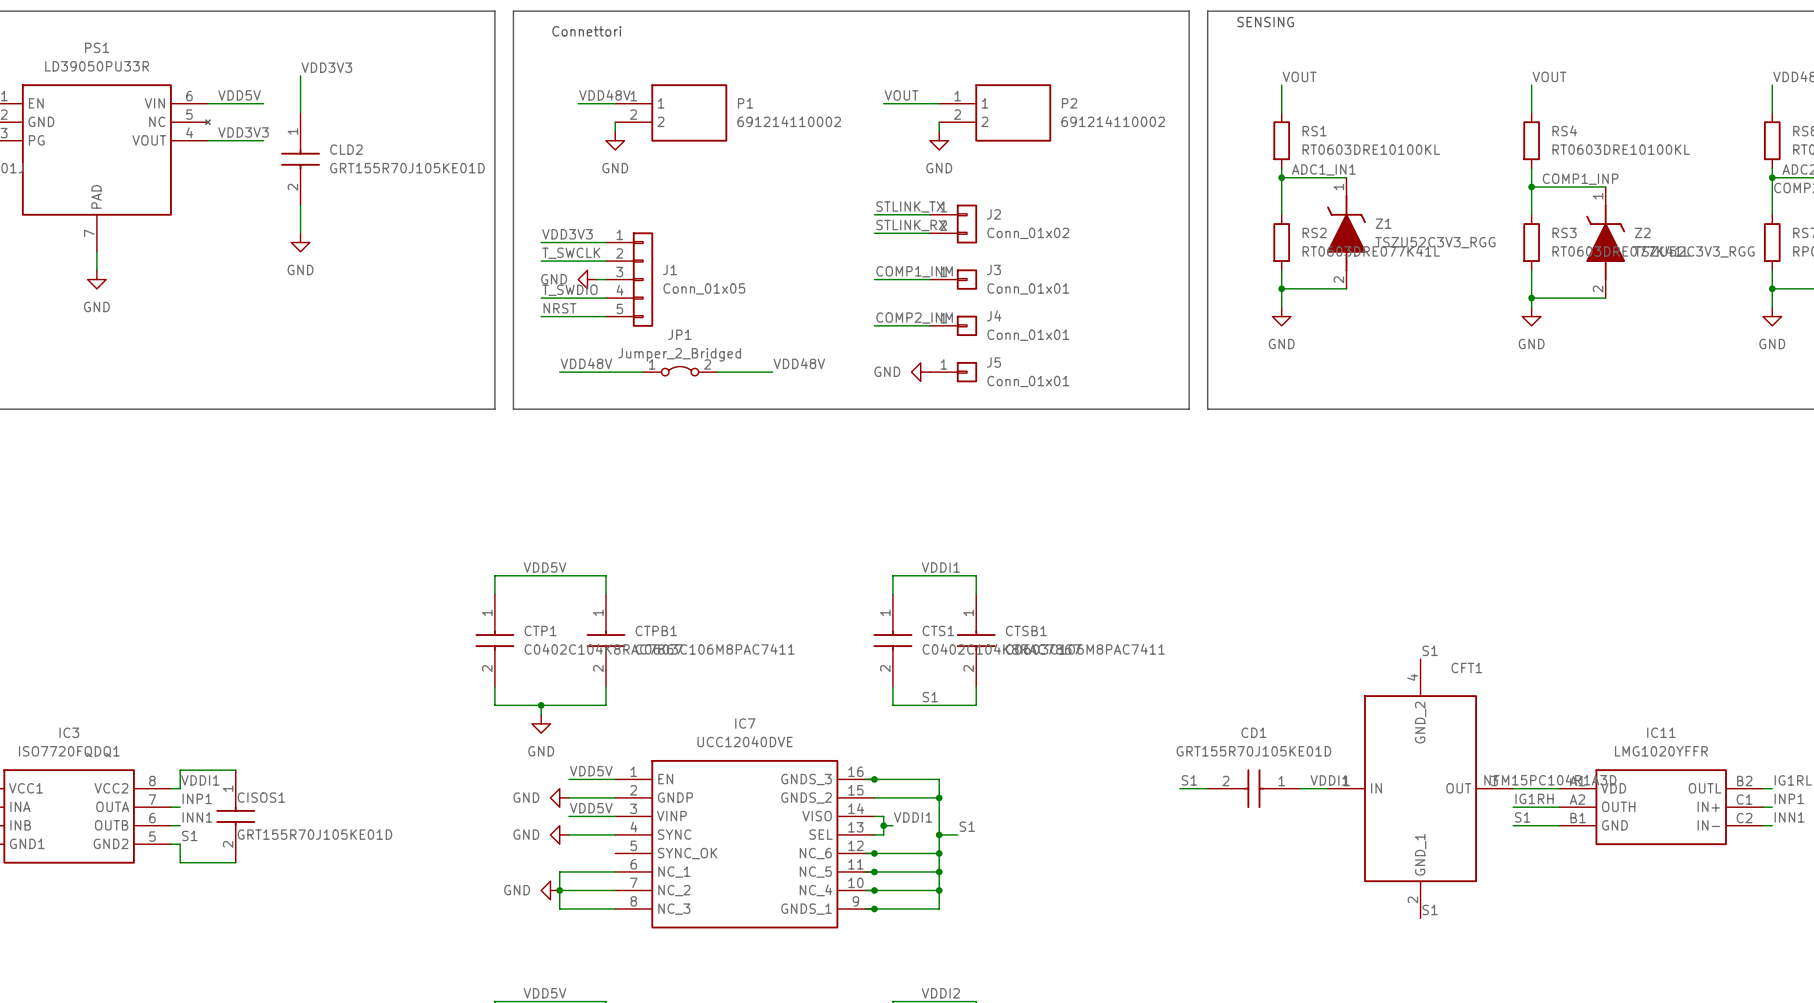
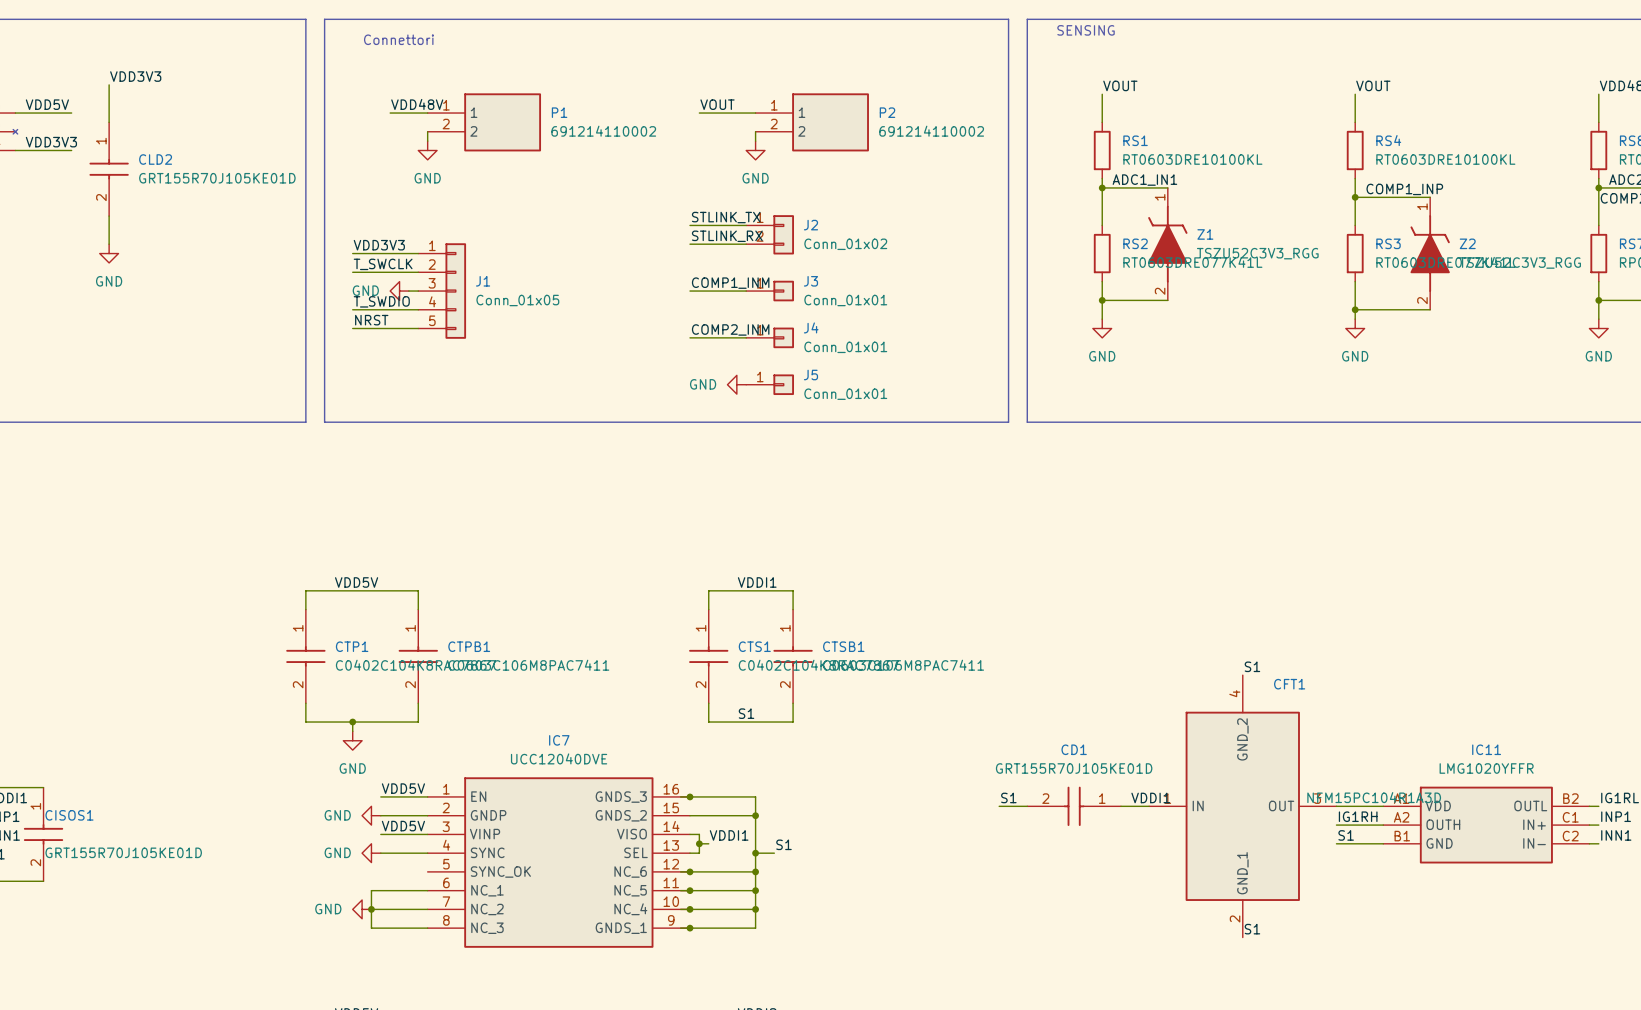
label: VDD48V (586, 363) -> none
label: VDD48V (799, 363) -> none
JP1: Jumper_2_Bridged (680, 371) -> none
wire: (559, 372) (643, 372) -> none
wire: (717, 372) (772, 372) -> none

